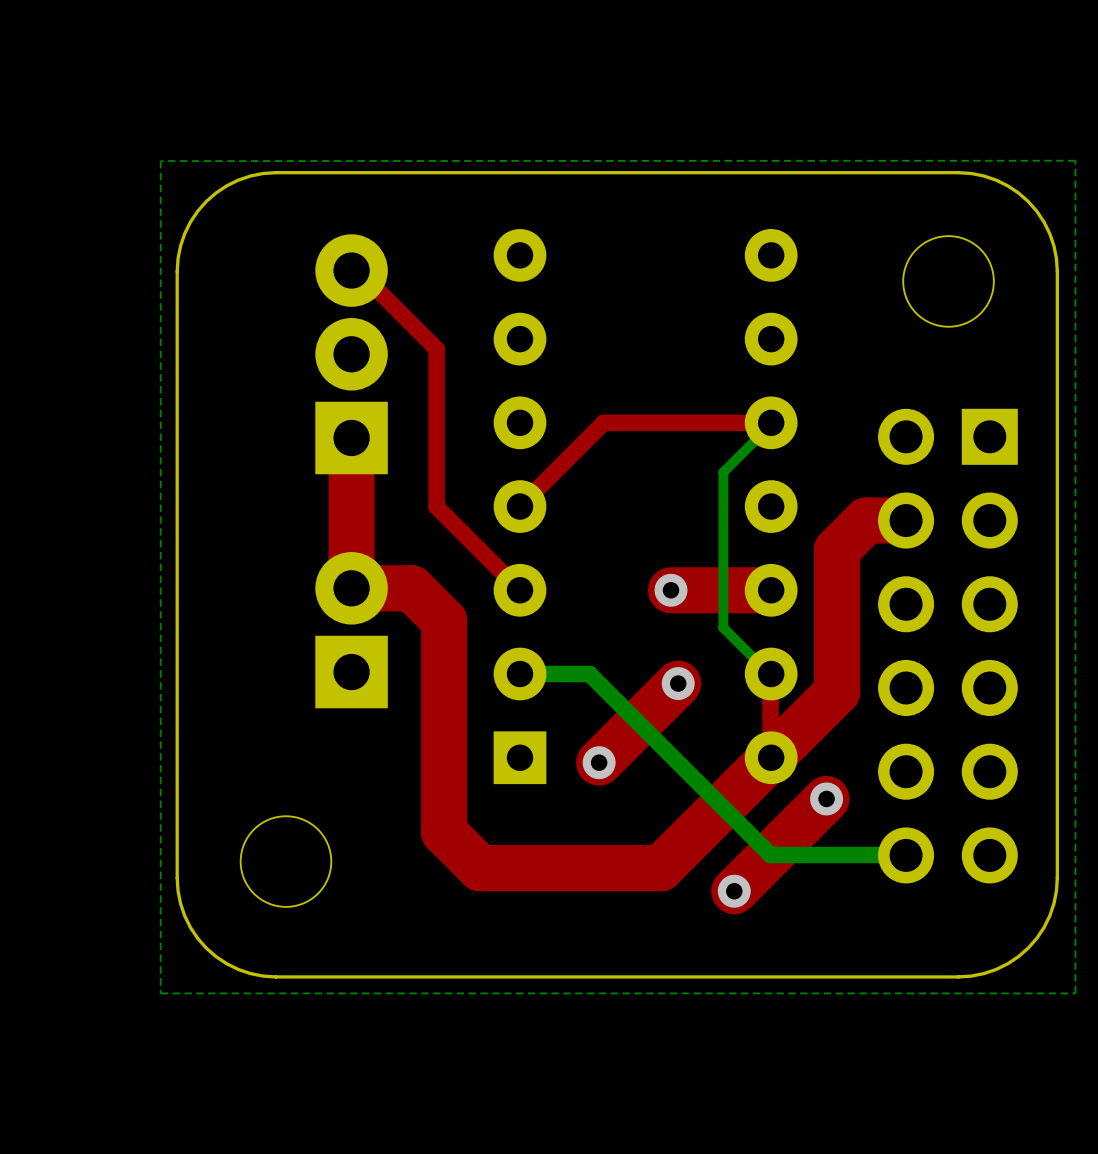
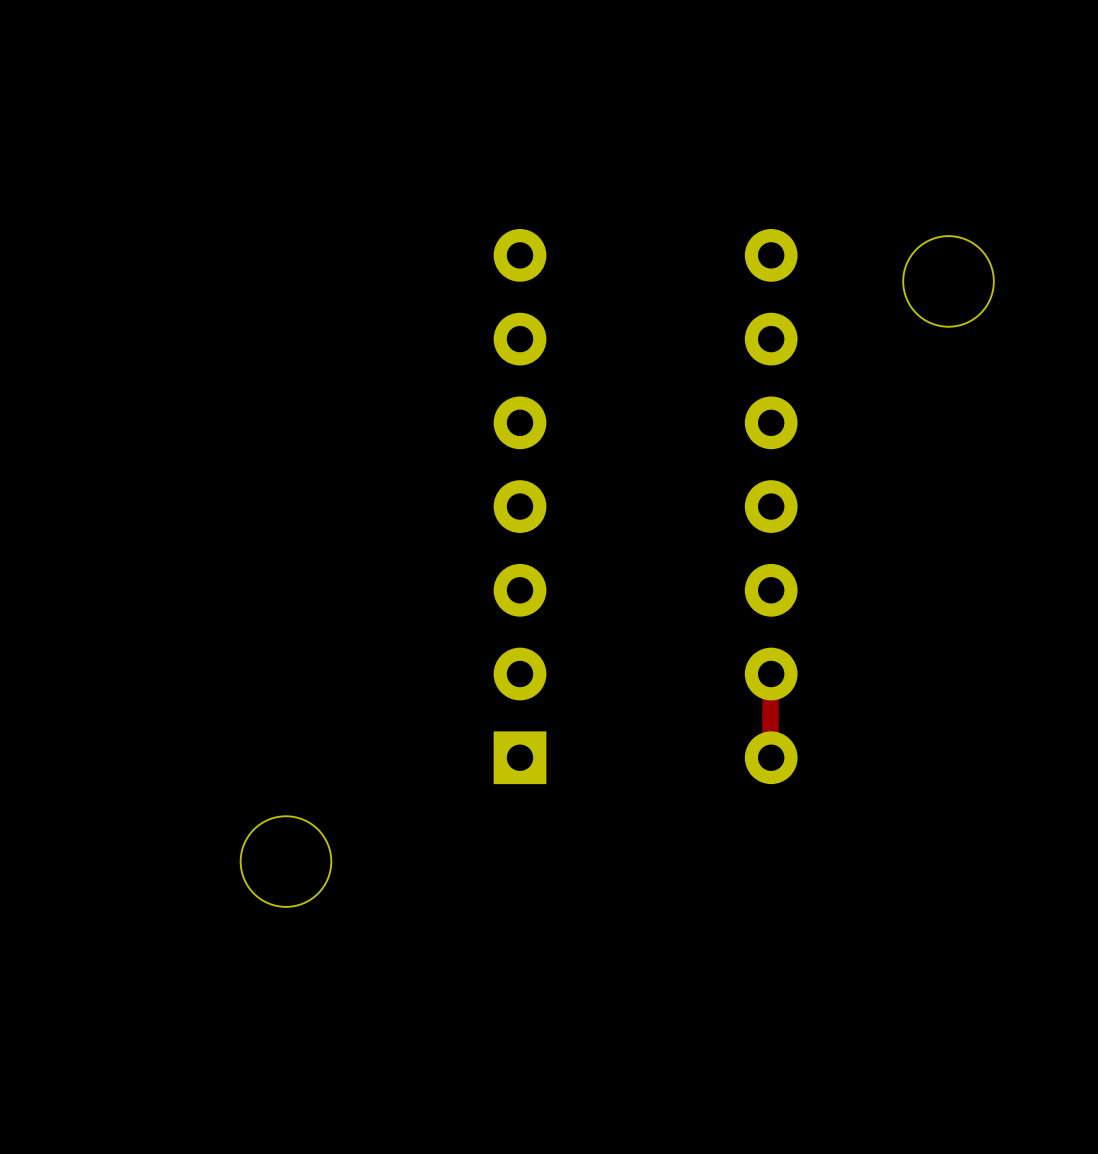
bottom zone outline: (1075, 160) (1075, 993) (160, 993) (160, 161) (1075, 160) -> none
board edge: (958, 172) (276, 172) (263, 173) (238, 180) (226, 185) (206, 201) (197, 211) (184, 233) (178, 258) (177, 271) (177, 878) (178, 890) (184, 915) (197, 938) (206, 947) (226, 963) (238, 969) (263, 976) (276, 976) (958, 976) (971, 976) (996, 969) (1007, 963) (1028, 947) (1044, 927) (1049, 915) (1053, 903) (1057, 878) (1056, 258) (1049, 233) (1044, 222) (1028, 201) (1007, 185) (996, 180) (971, 173) (958, 172) -> none
top track: (351, 270) (358, 270) (436, 349) (436, 506) (520, 590) -> none
part: (351, 354) -> none
top track: (771, 422) (603, 422) (520, 506) -> none
bottom track: (771, 424) (723, 472) (723, 627) (771, 675) -> none
top track: (351, 438) (351, 588) (411, 588) (444, 620) (444, 832) (480, 868) (660, 868) (837, 691) (837, 549) (866, 520) (906, 520) -> none
via: (670, 590) -> none
top track: (771, 590) (670, 590) -> none
part: (351, 630) -> none
part: (947, 646) -> none
bottom track: (520, 674) (589, 674) (770, 854) (905, 854) -> none
top track: (678, 683) (599, 762) -> none
via: (678, 683) -> none
via: (599, 762) -> none
top track: (826, 798) (734, 891) -> none
via: (826, 798) -> none
via: (734, 891) -> none

